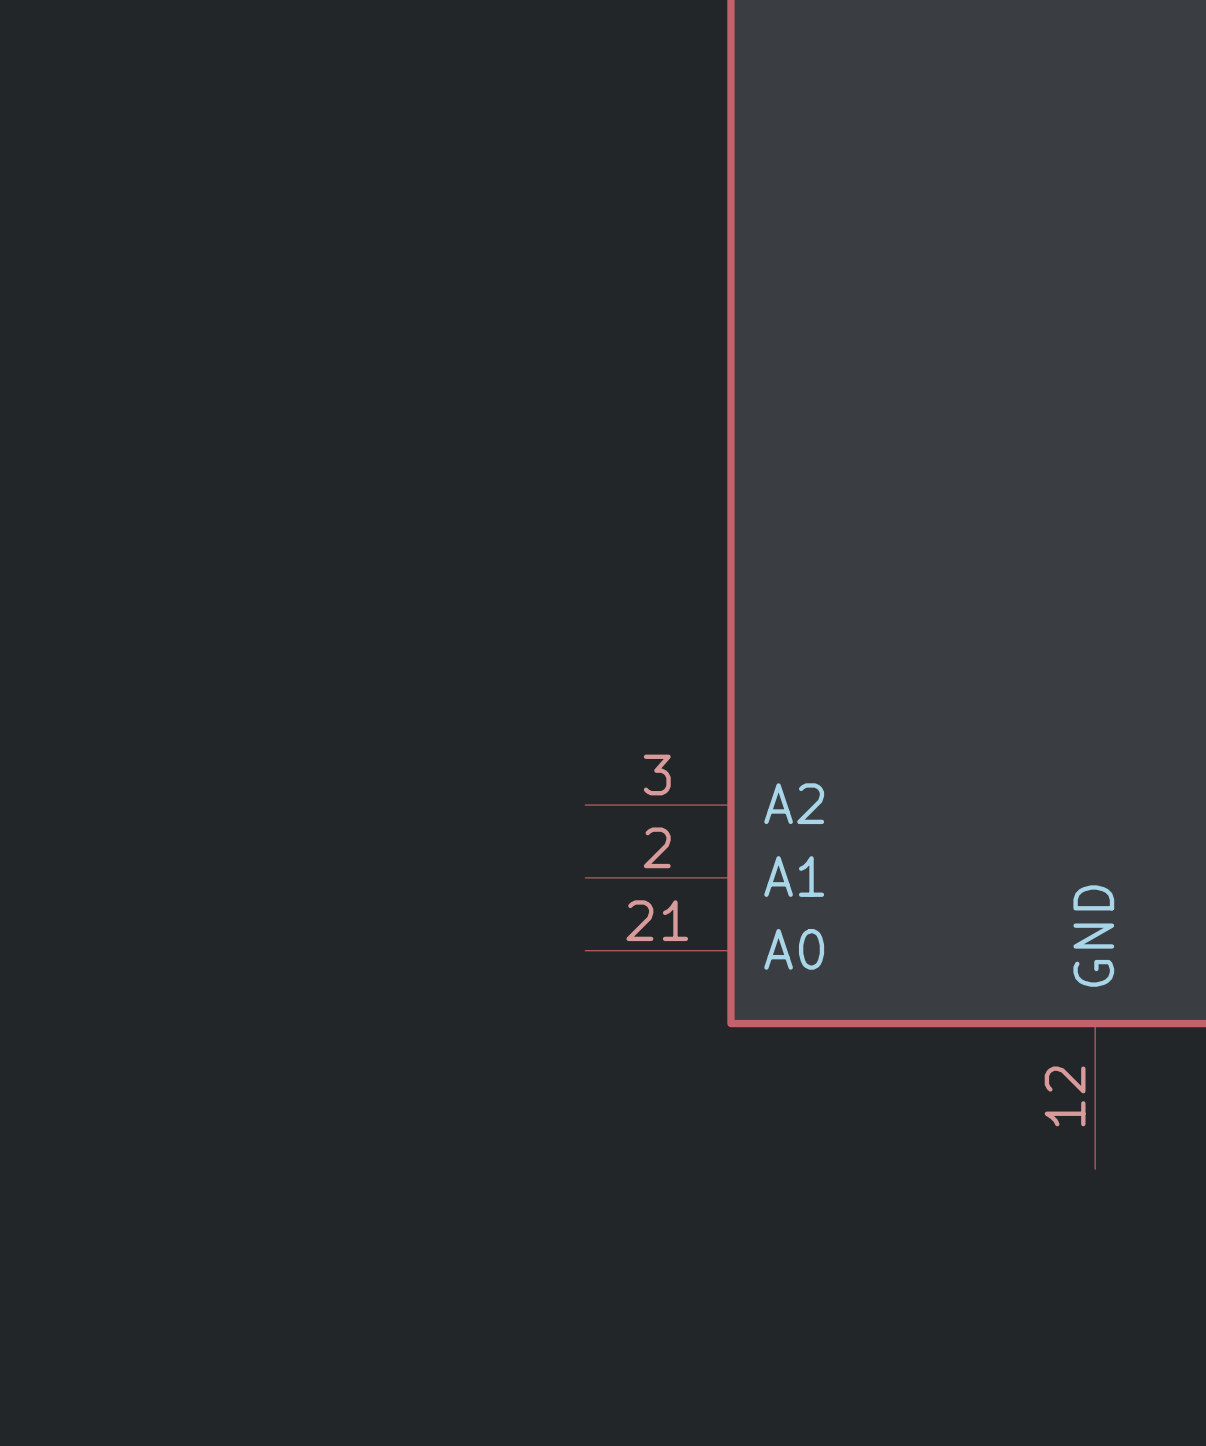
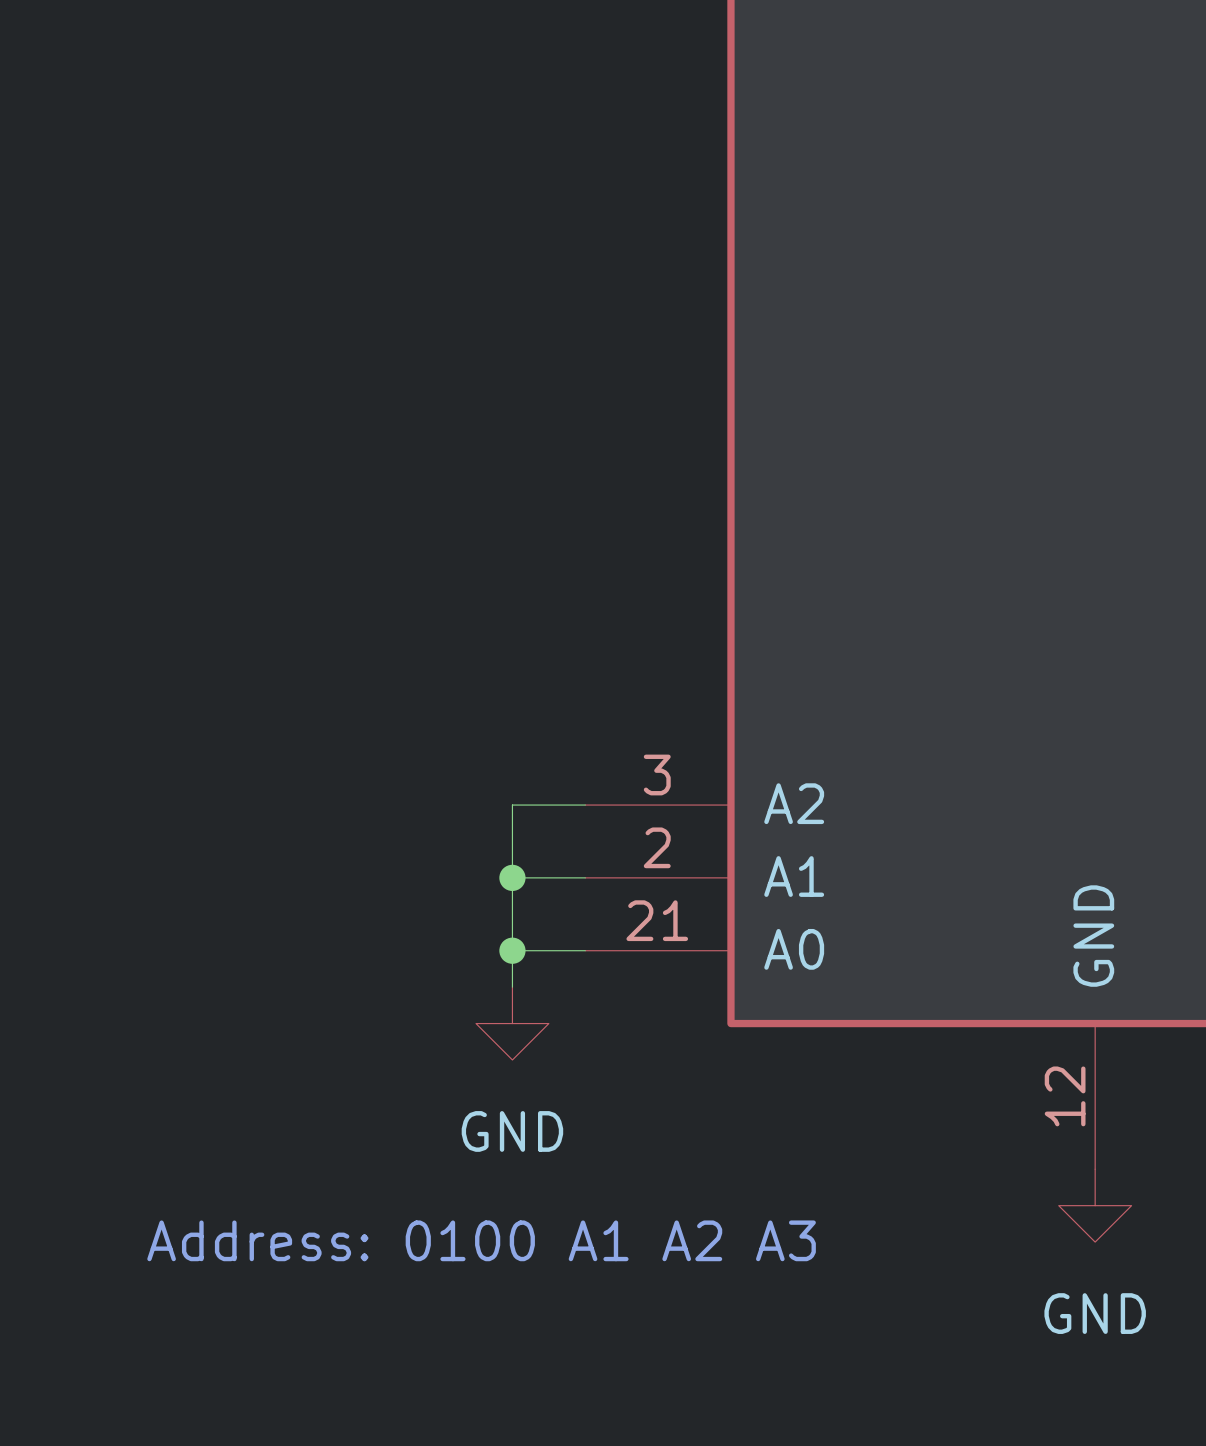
wire: none -> (585, 805) (512, 805) (512, 987)
wire: none -> (512, 877) (585, 877)
junction: none -> (512, 877)
wire: none -> (512, 950) (585, 950)
junction: none -> (512, 950)
power symbol: none -> GND (512, 1023)
power symbol: none -> GND (1095, 1205)
text: none -> Address: 0100 A1 A2 A3 (481, 1240)

